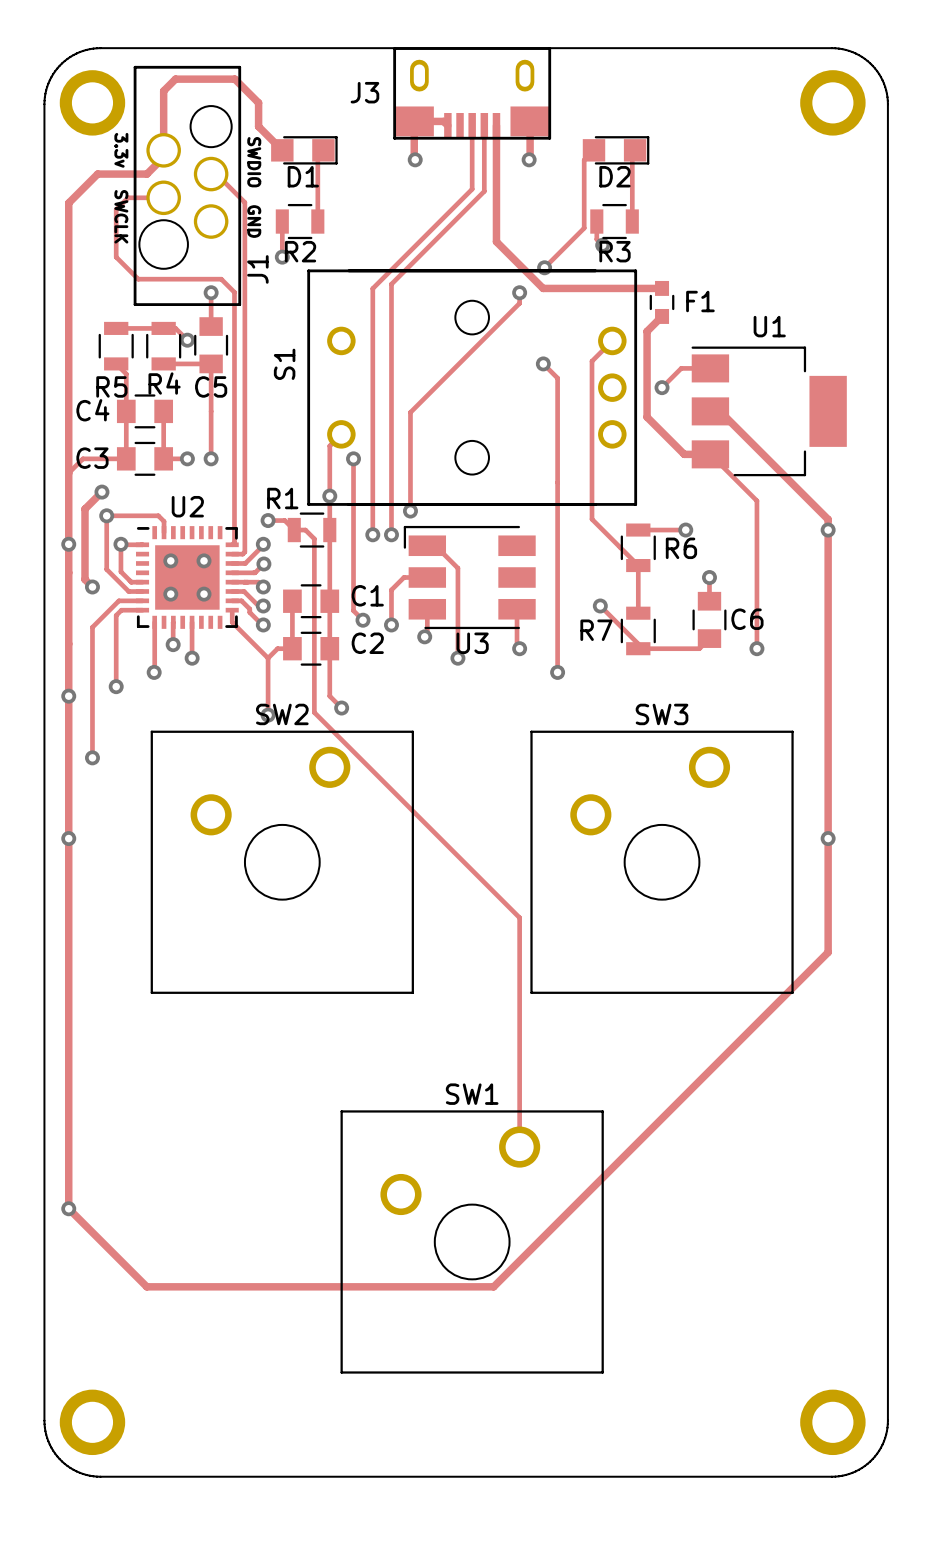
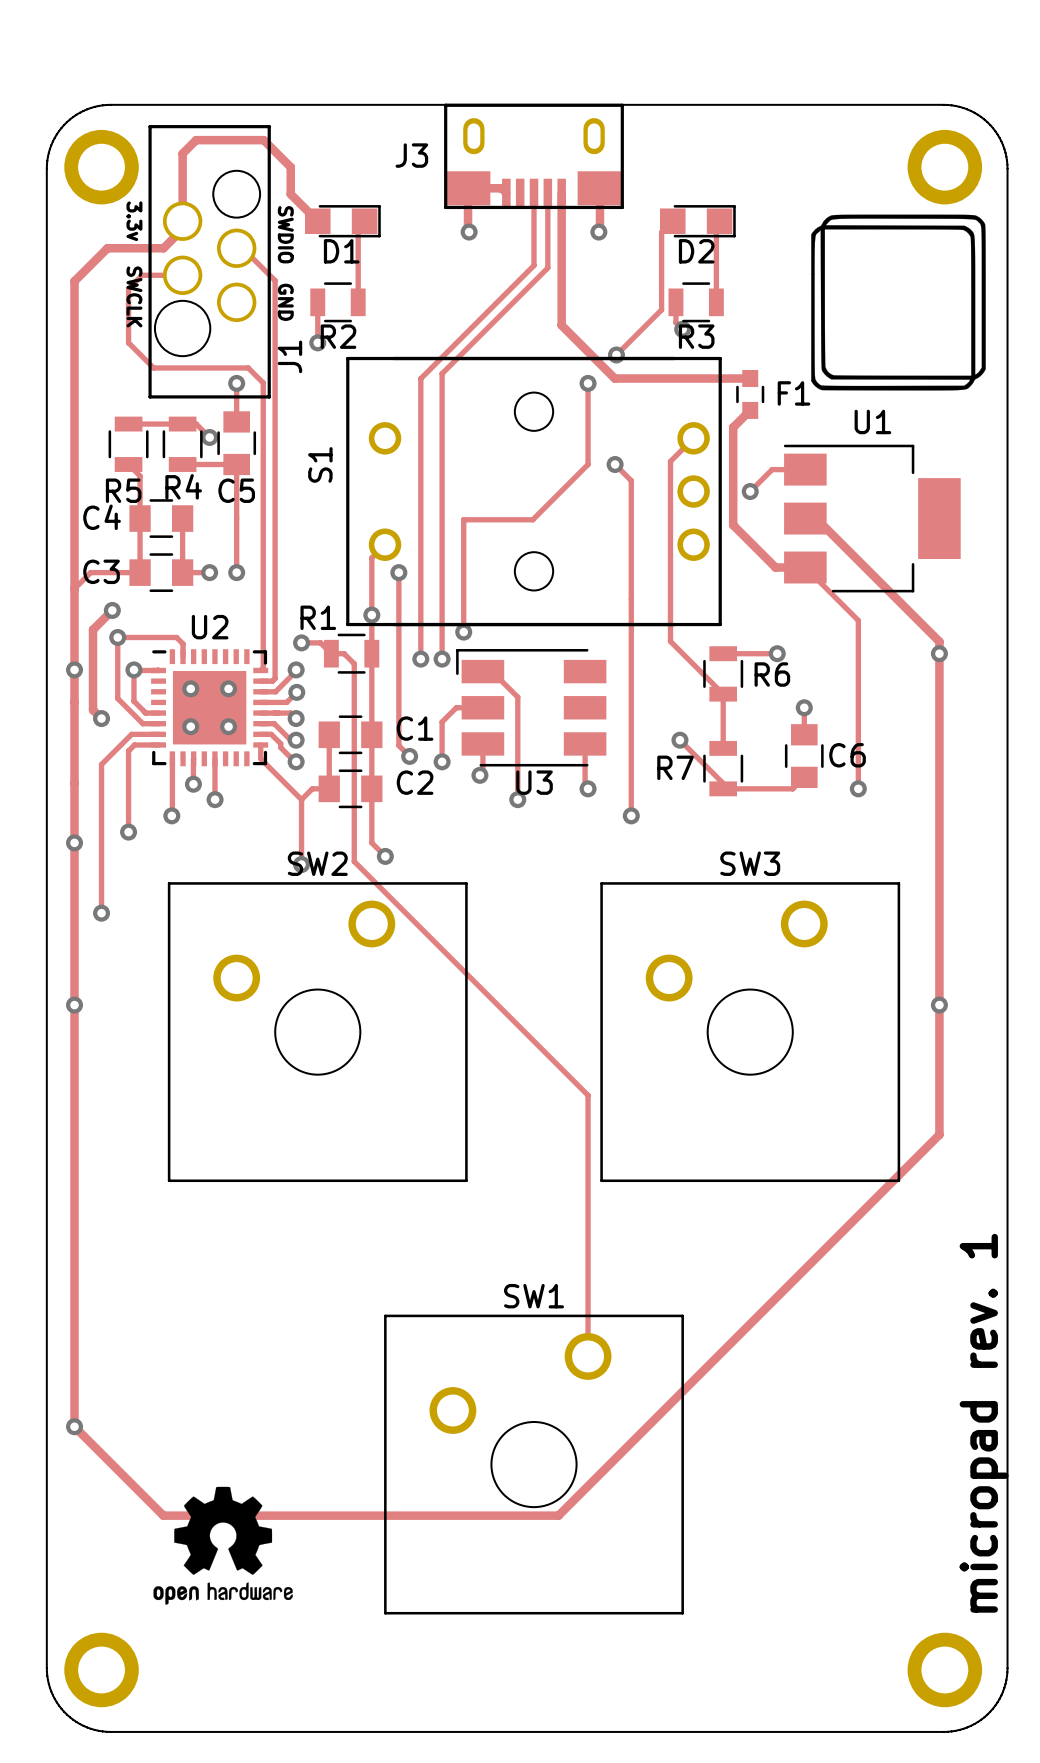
drawing: none -> [811, 214, 986, 391]
track: (519, 303) (410, 412) -> (588, 395) (588, 464) (532, 519) (463, 519)
text: none -> micropad rev. 1 (984, 1423)
drawing: none -> [153, 1486, 293, 1605]

